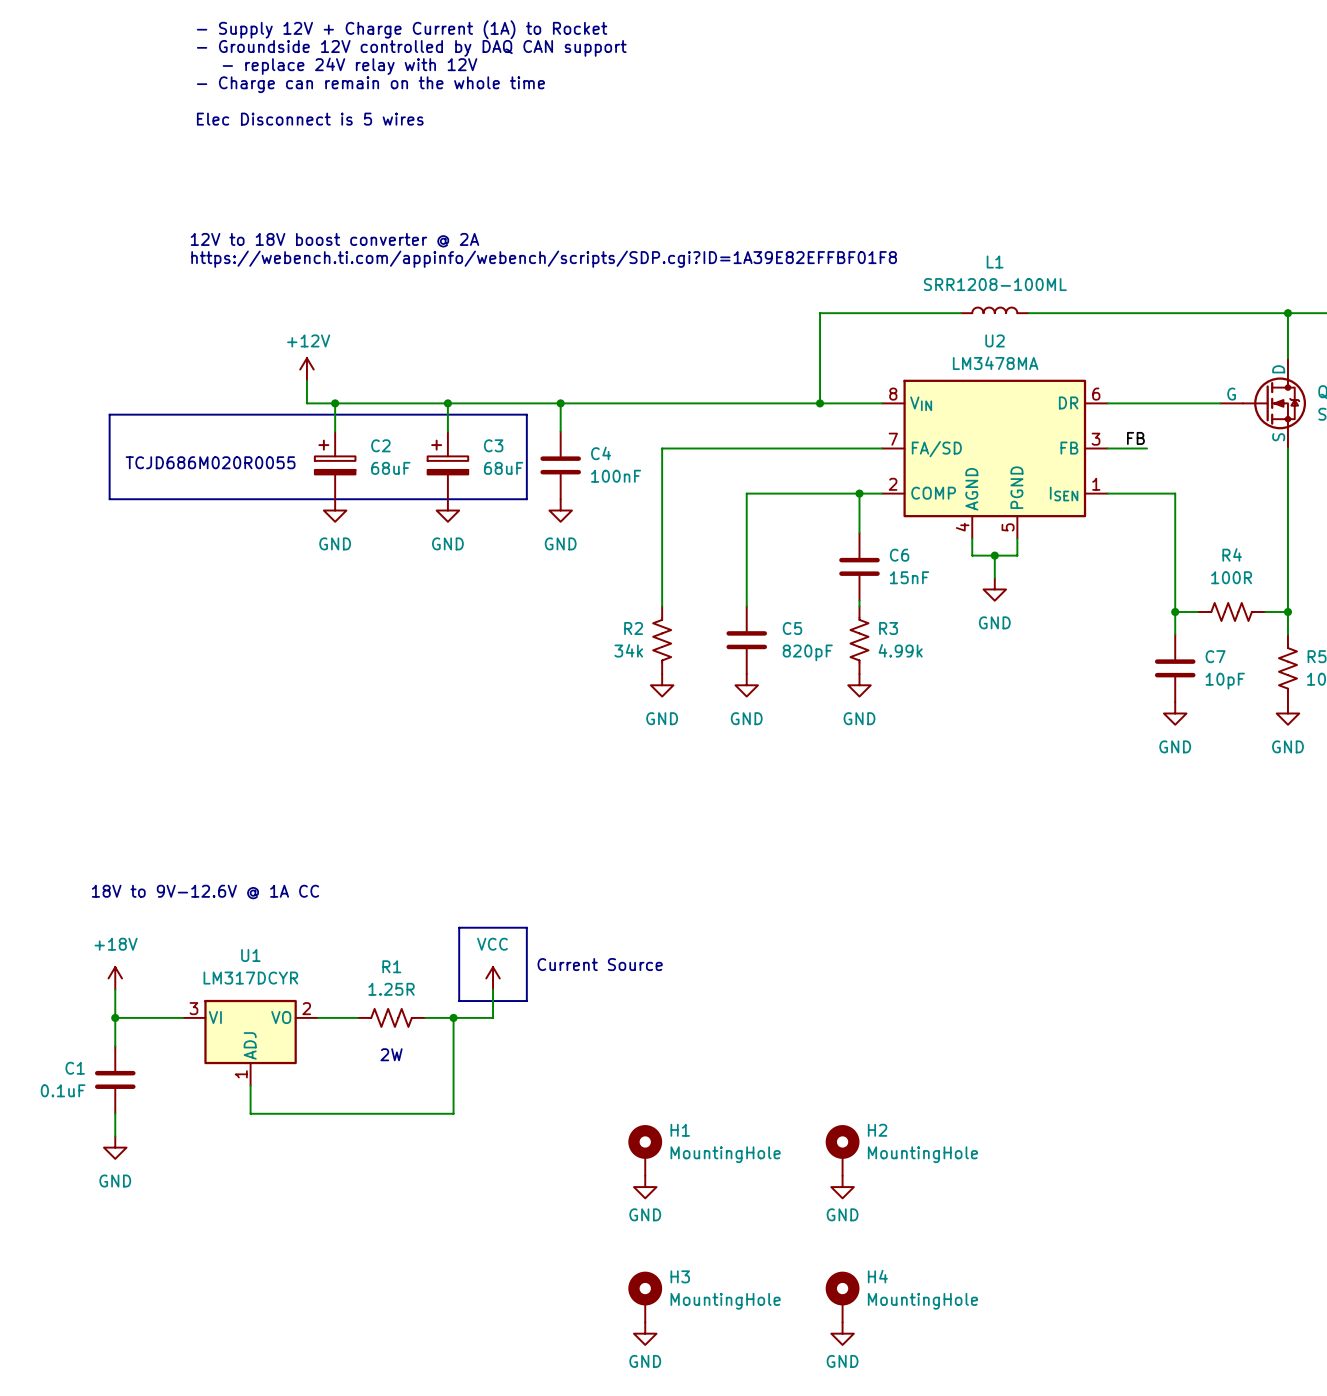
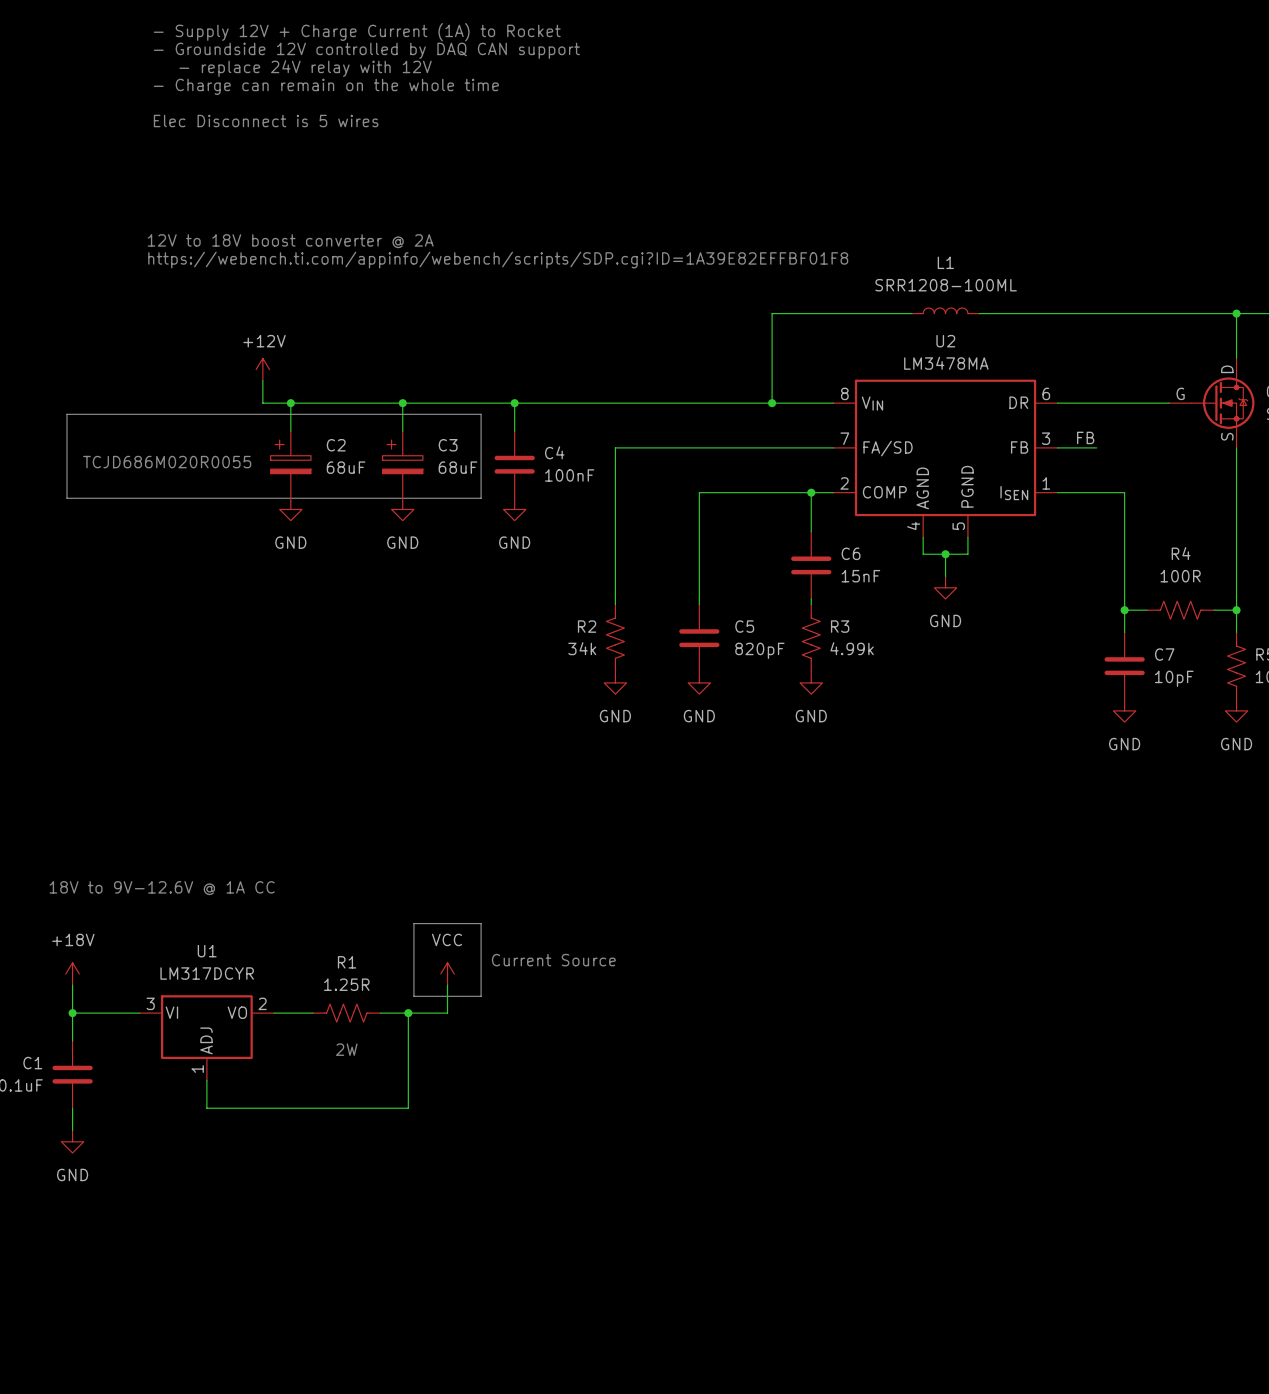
H1: MountingHole (645, 1150) -> none
H2: MountingHole (842, 1150) -> none
power symbol: GND (645, 1187) -> none
power symbol: GND (842, 1187) -> none
H3: MountingHole (645, 1297) -> none
H4: MountingHole (842, 1297) -> none
power symbol: GND (645, 1333) -> none
power symbol: GND (842, 1333) -> none

